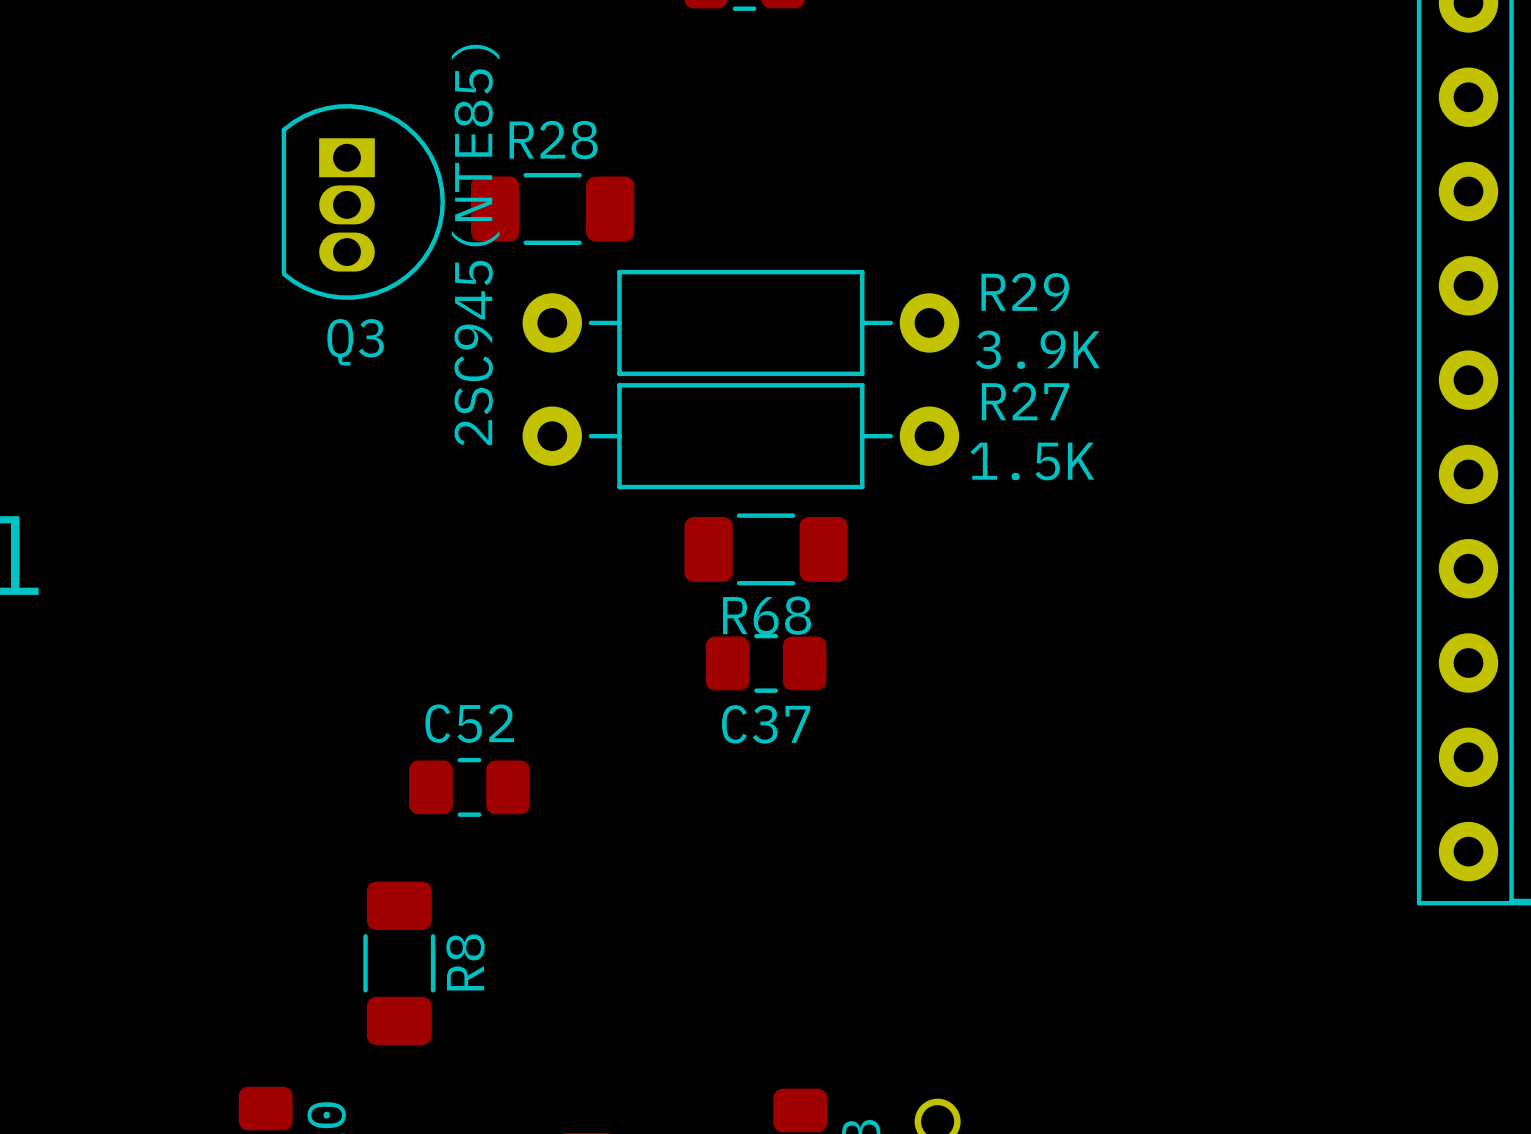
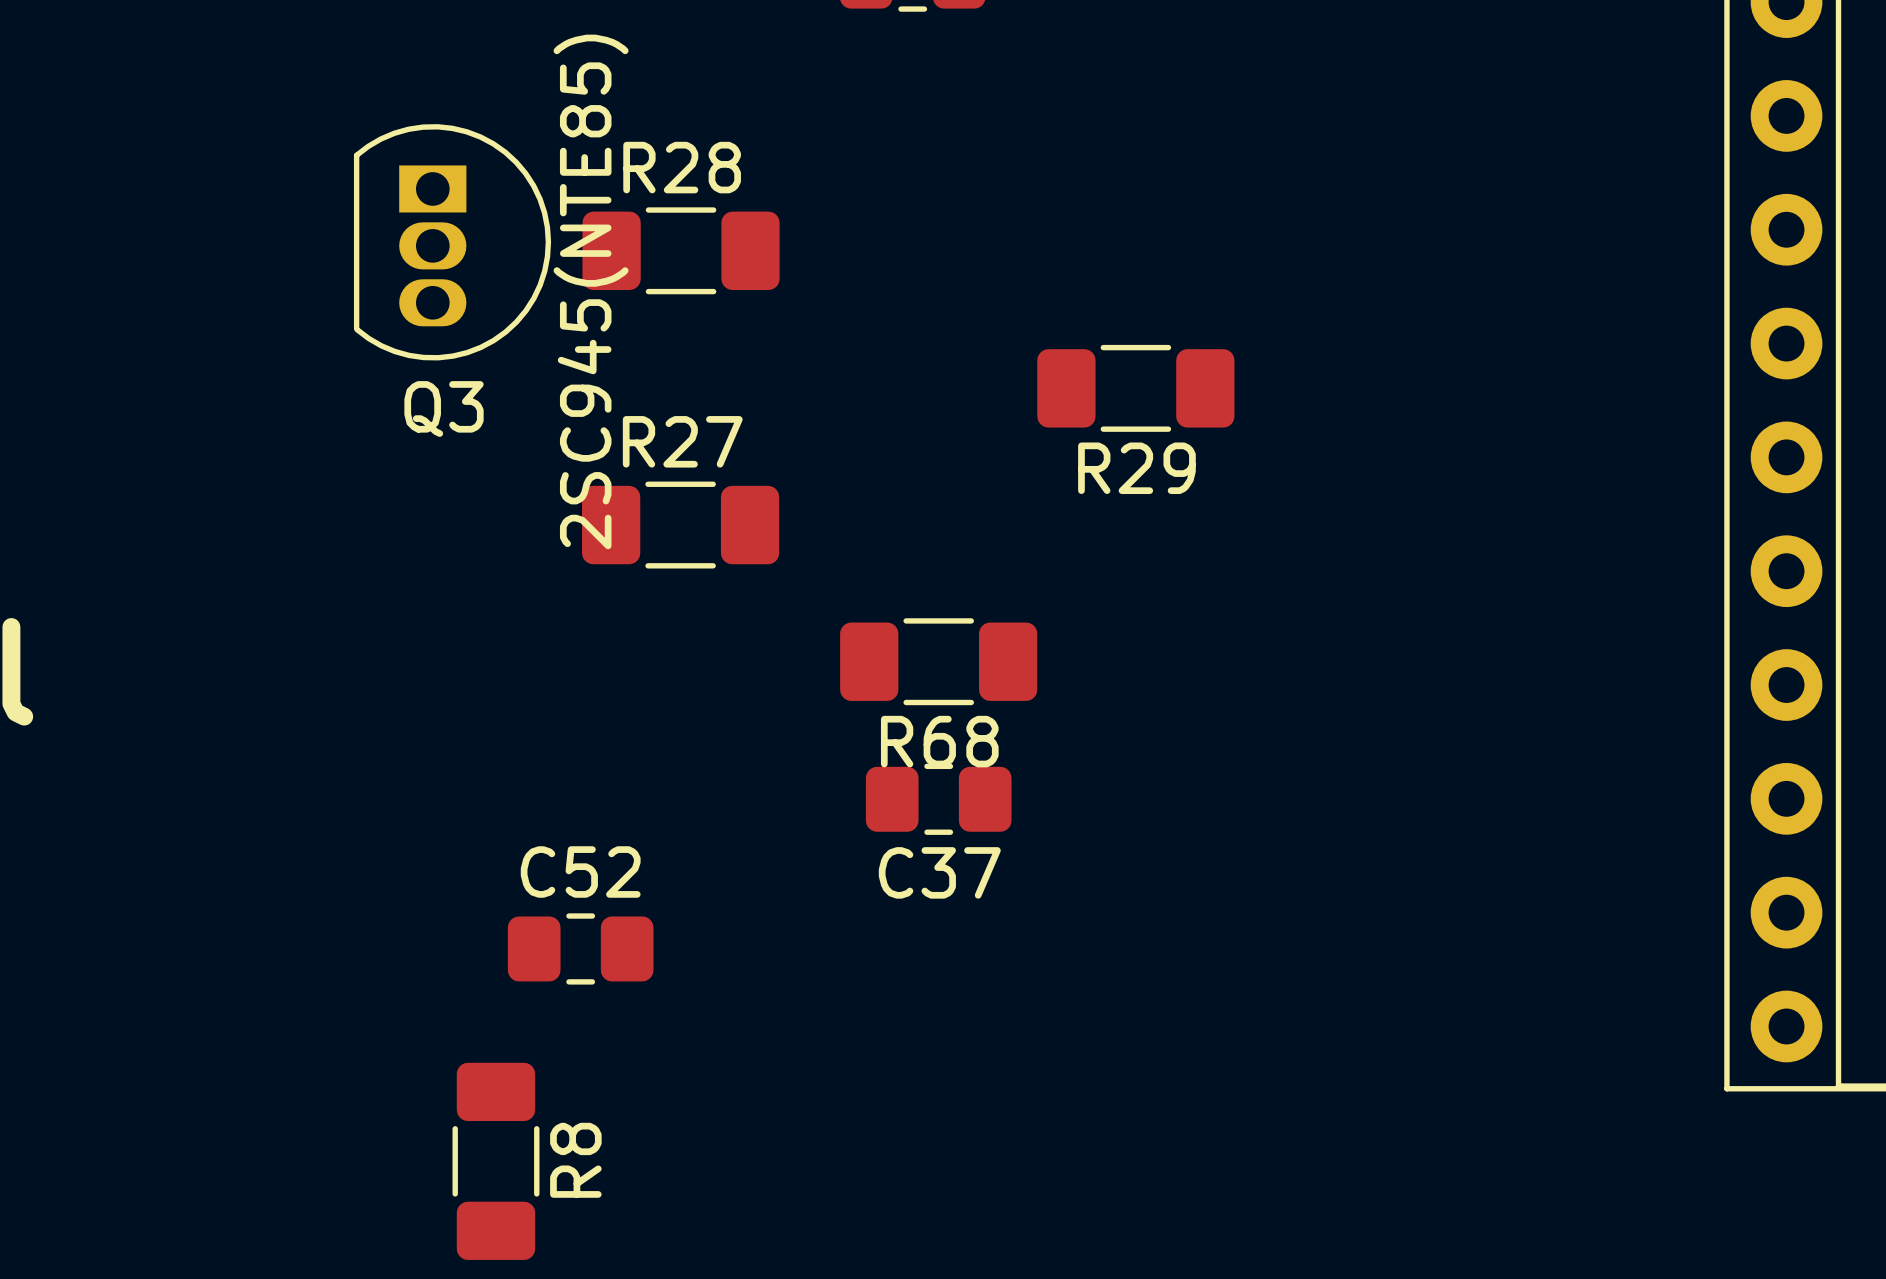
R29 footprint: [522, 269, 960, 377] -> [1037, 344, 1235, 432]
R29 name position: R29 (1025, 291) -> R29 (1136, 468)
R29 value: 3.9K (1037, 349) -> none
R27 footprint: [522, 383, 960, 490] -> [582, 481, 780, 569]
R27 name position: R27 (1025, 401) -> R27 (682, 441)
R27 value: 1.5K (1032, 461) -> none

